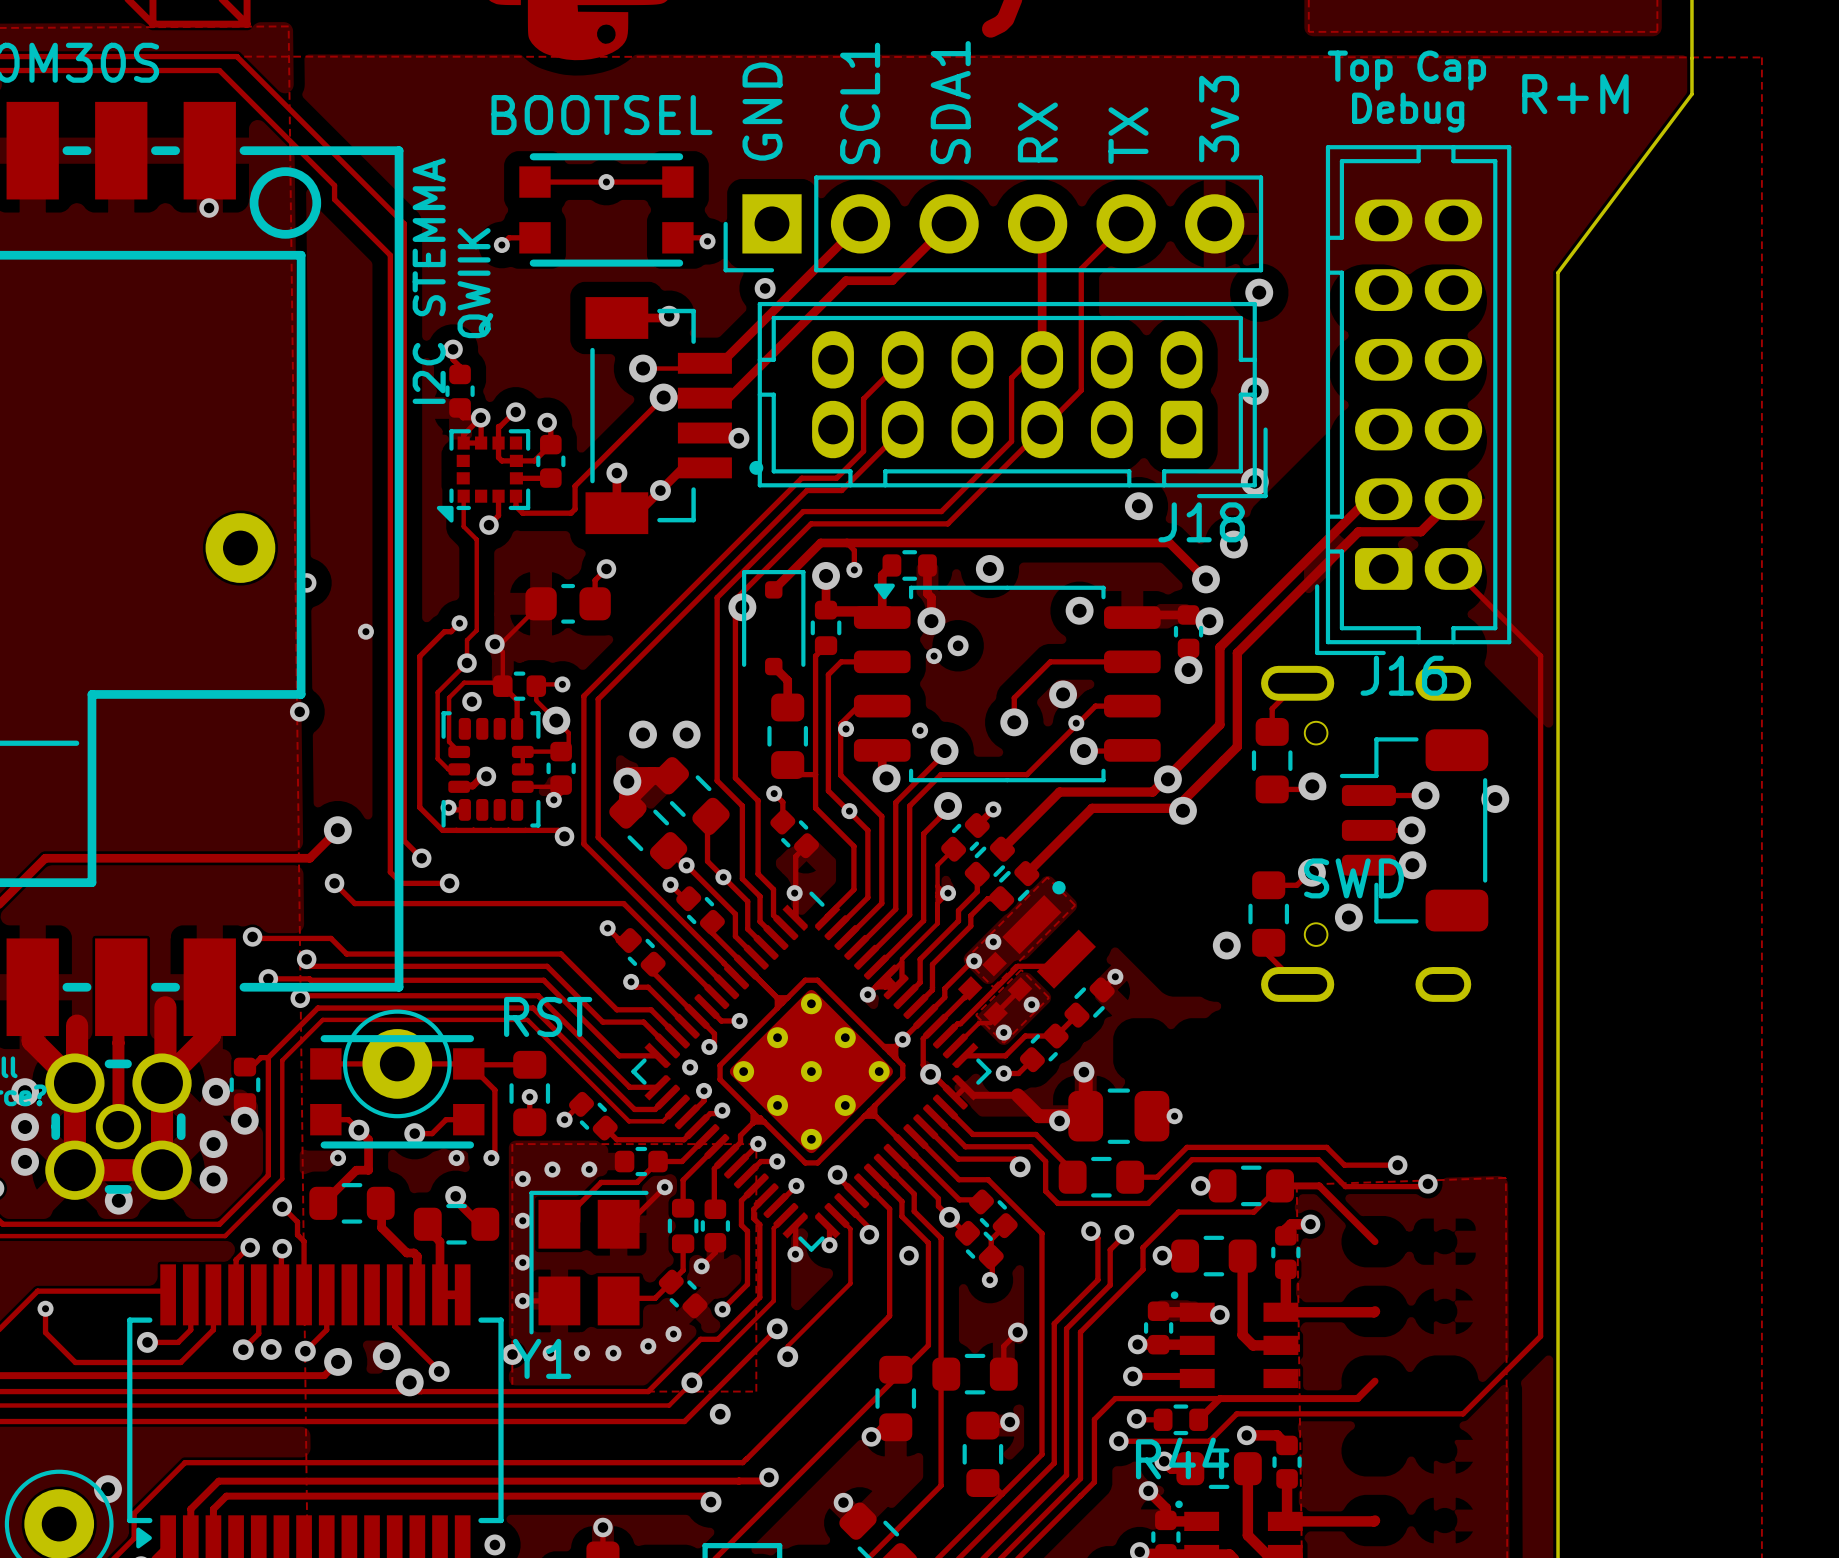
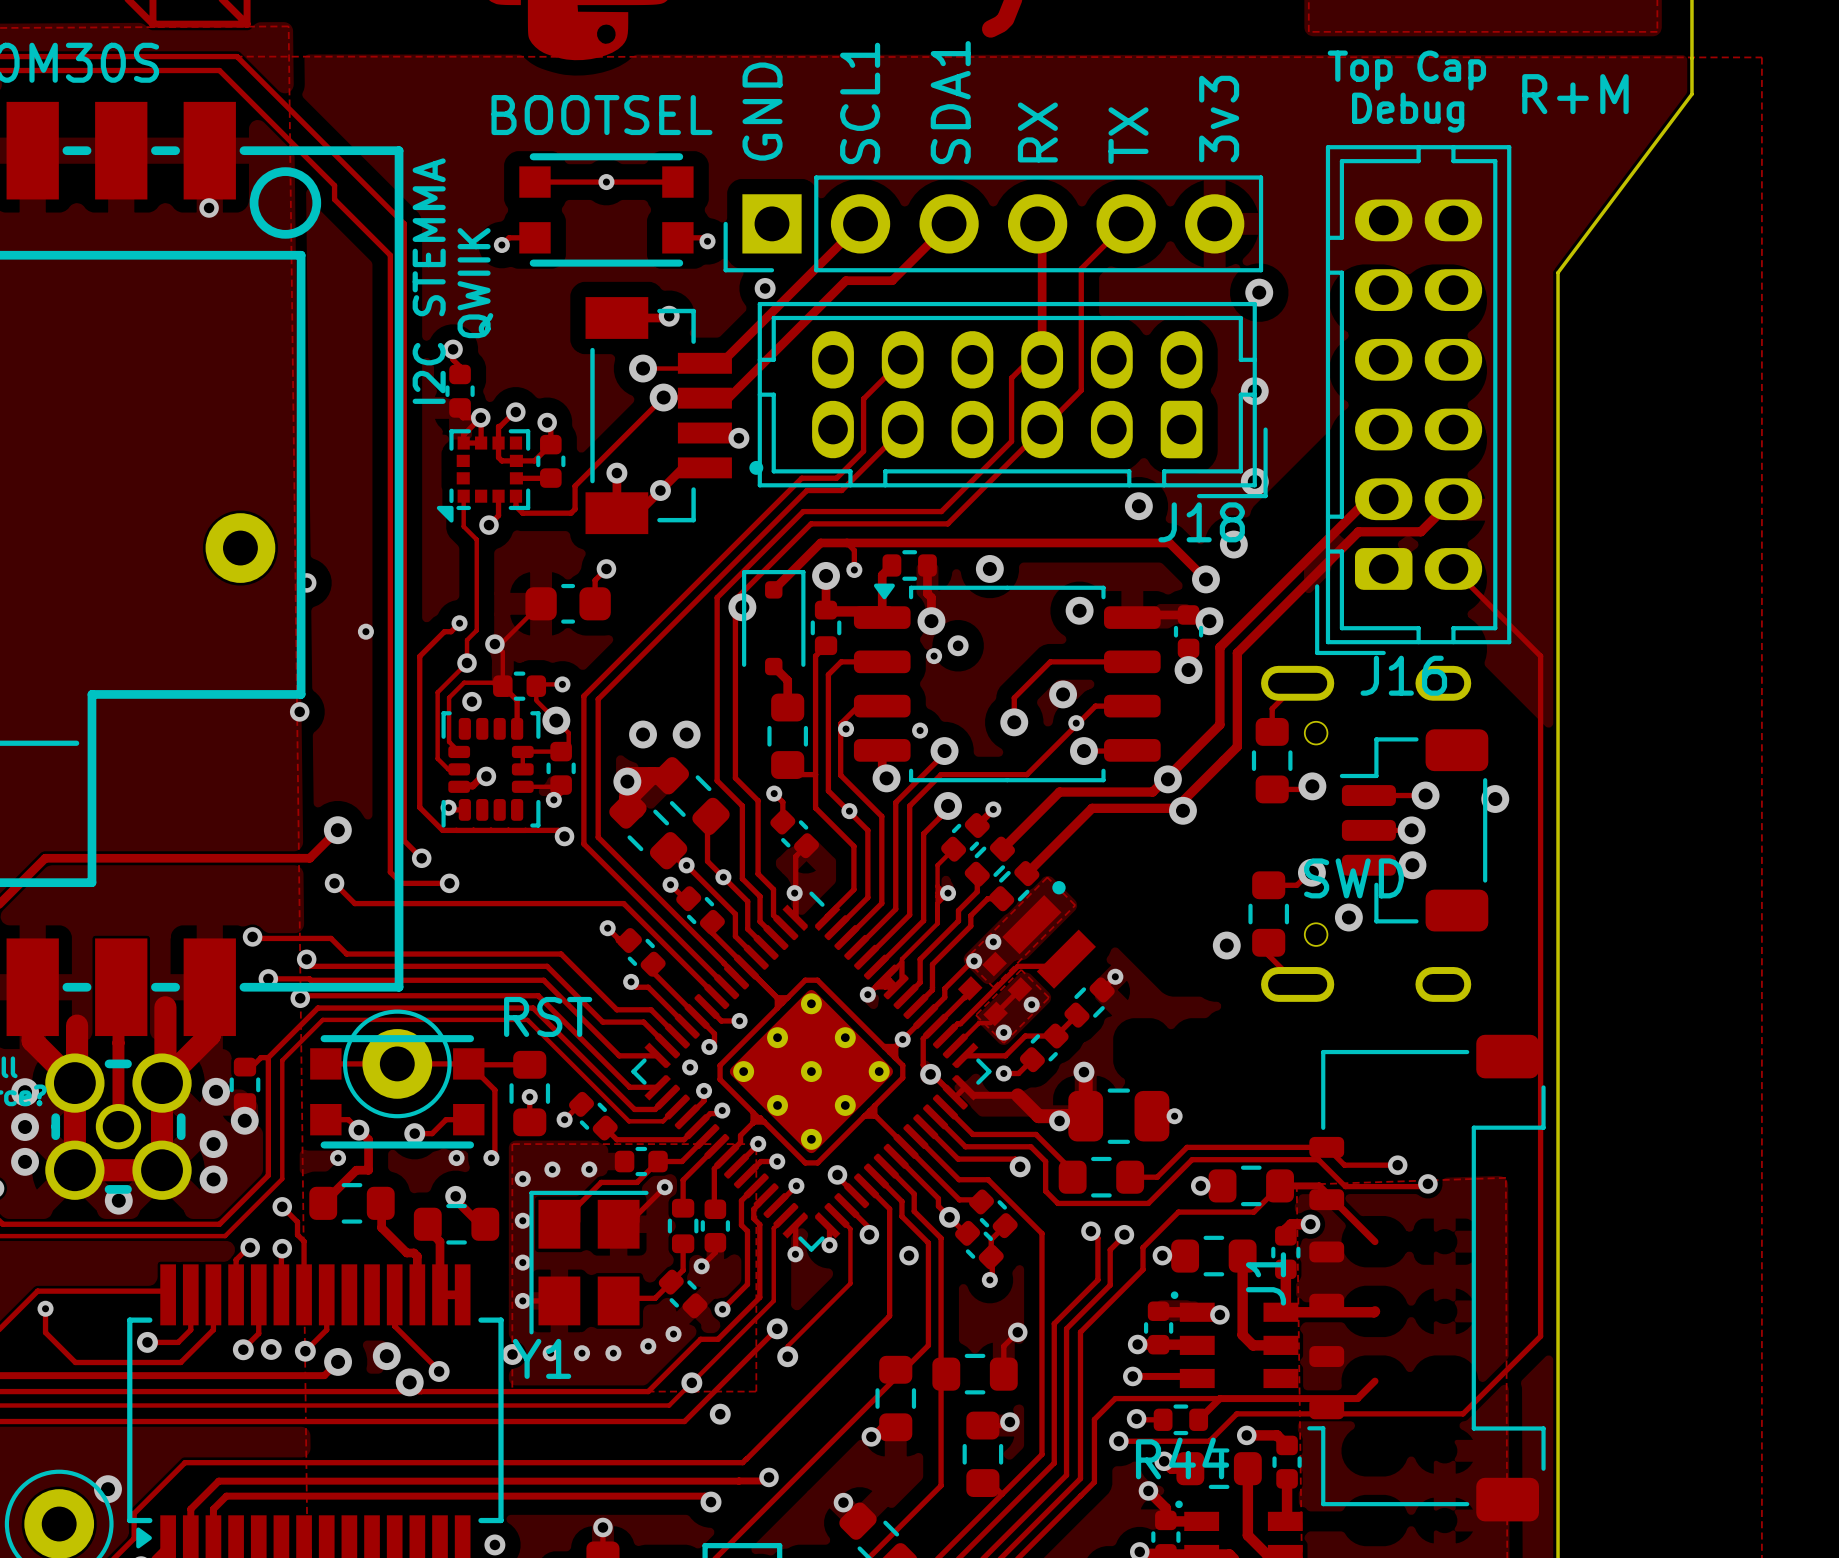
J1: none -> (1426, 1278)
track: (1375, 1520) (1285, 1521) -> none

